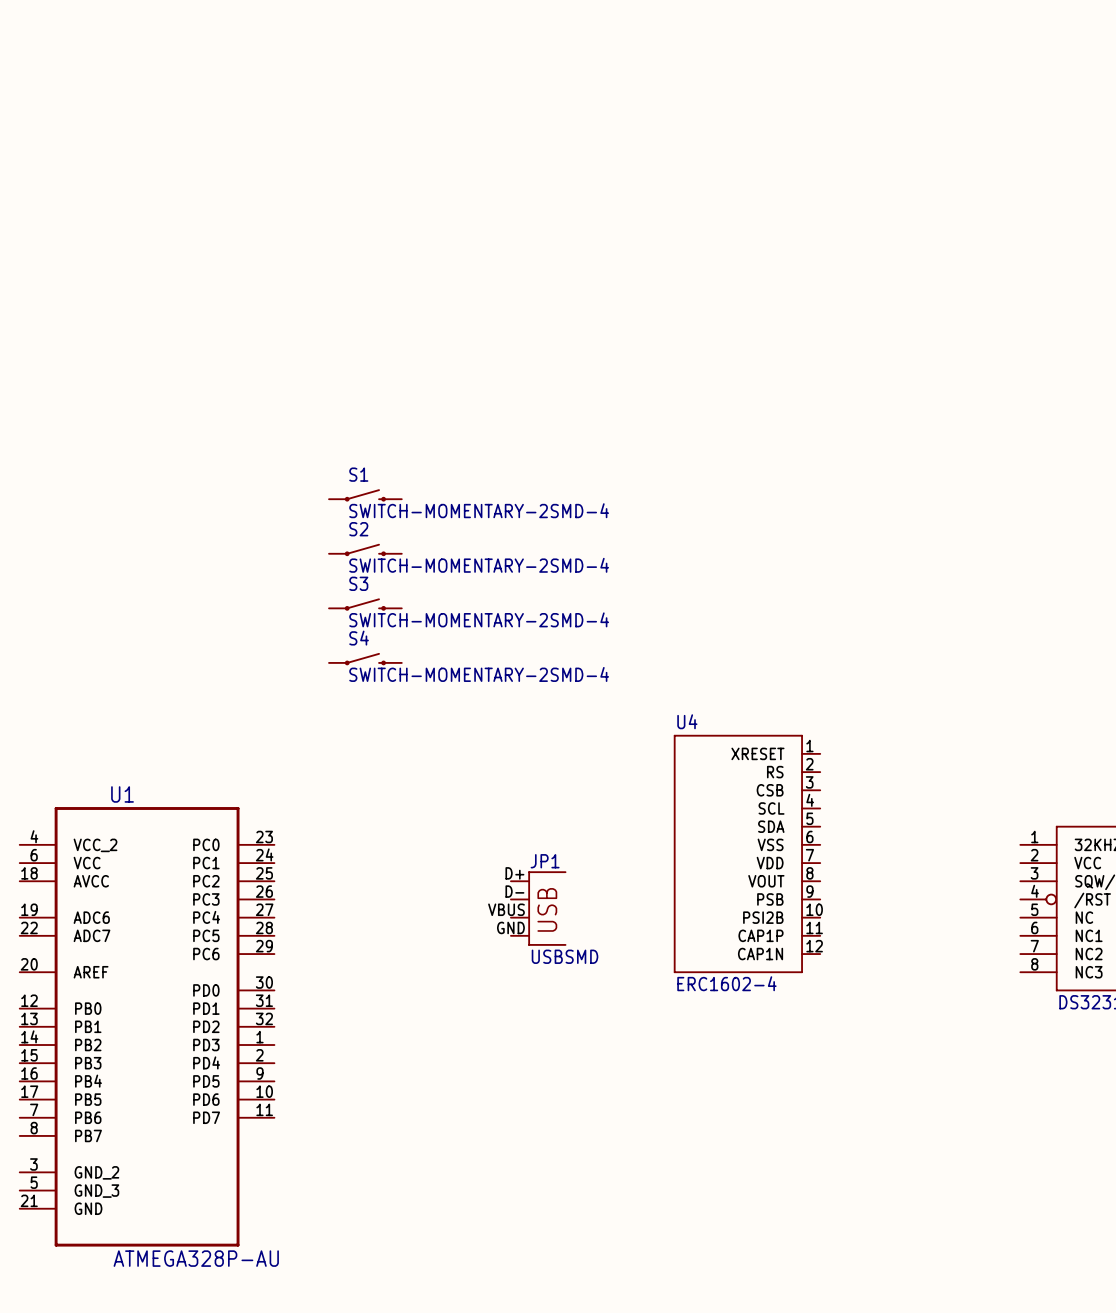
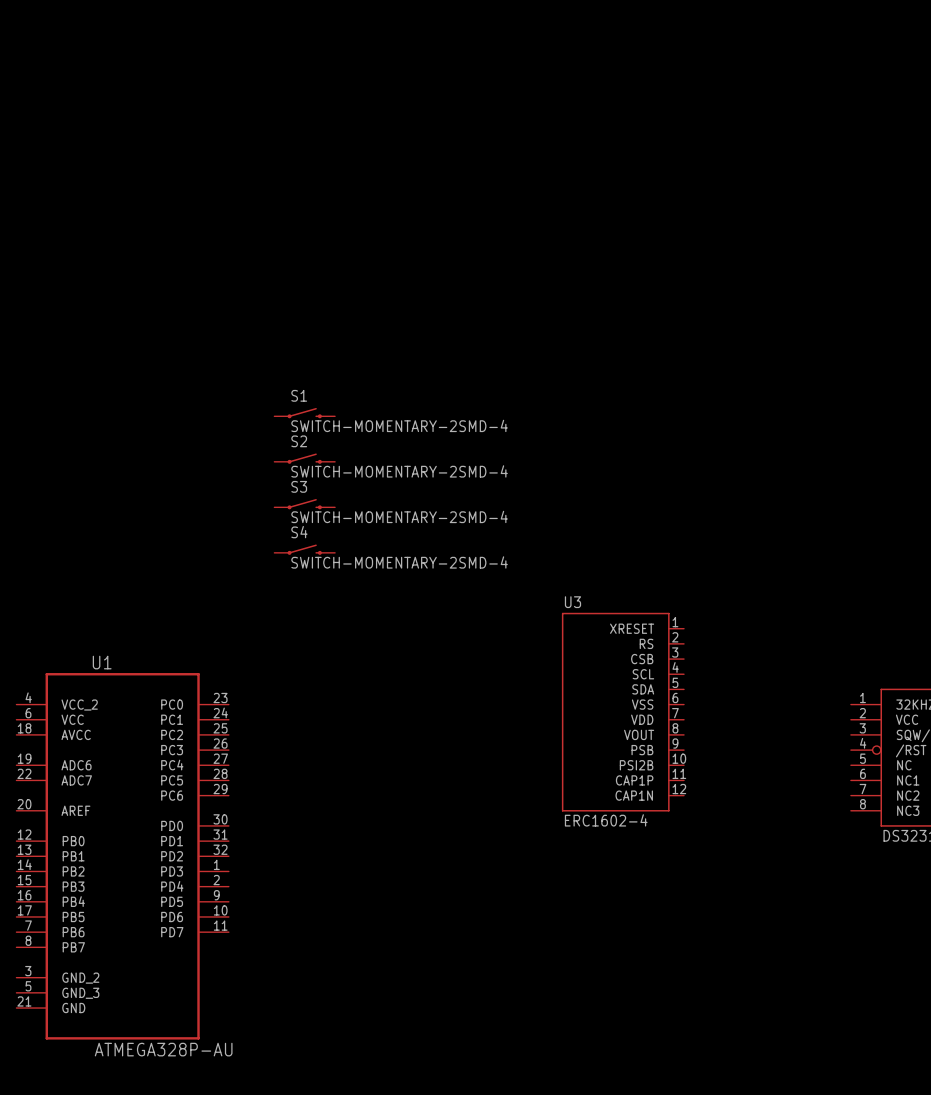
U4 name: U4 (687, 721) -> U3 (572, 602)
JP1: USBSMD (538, 908) -> none

